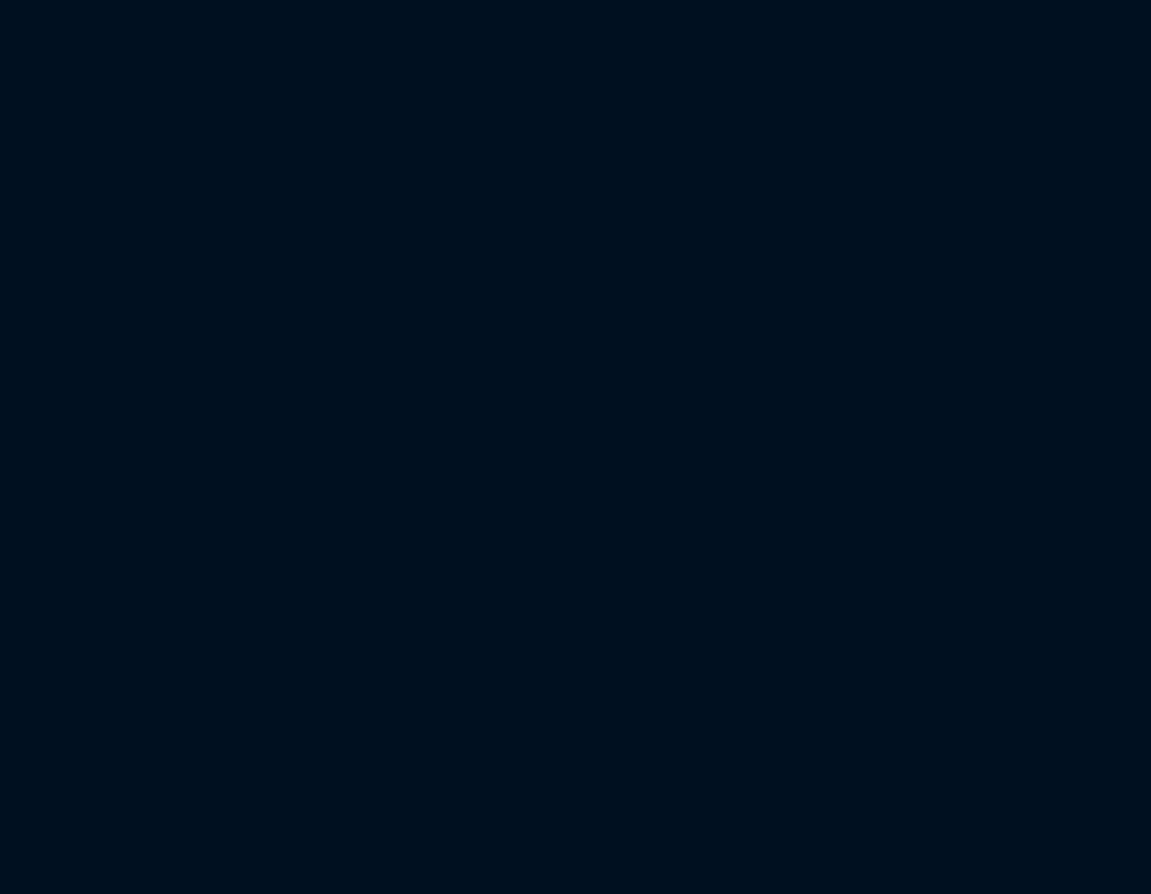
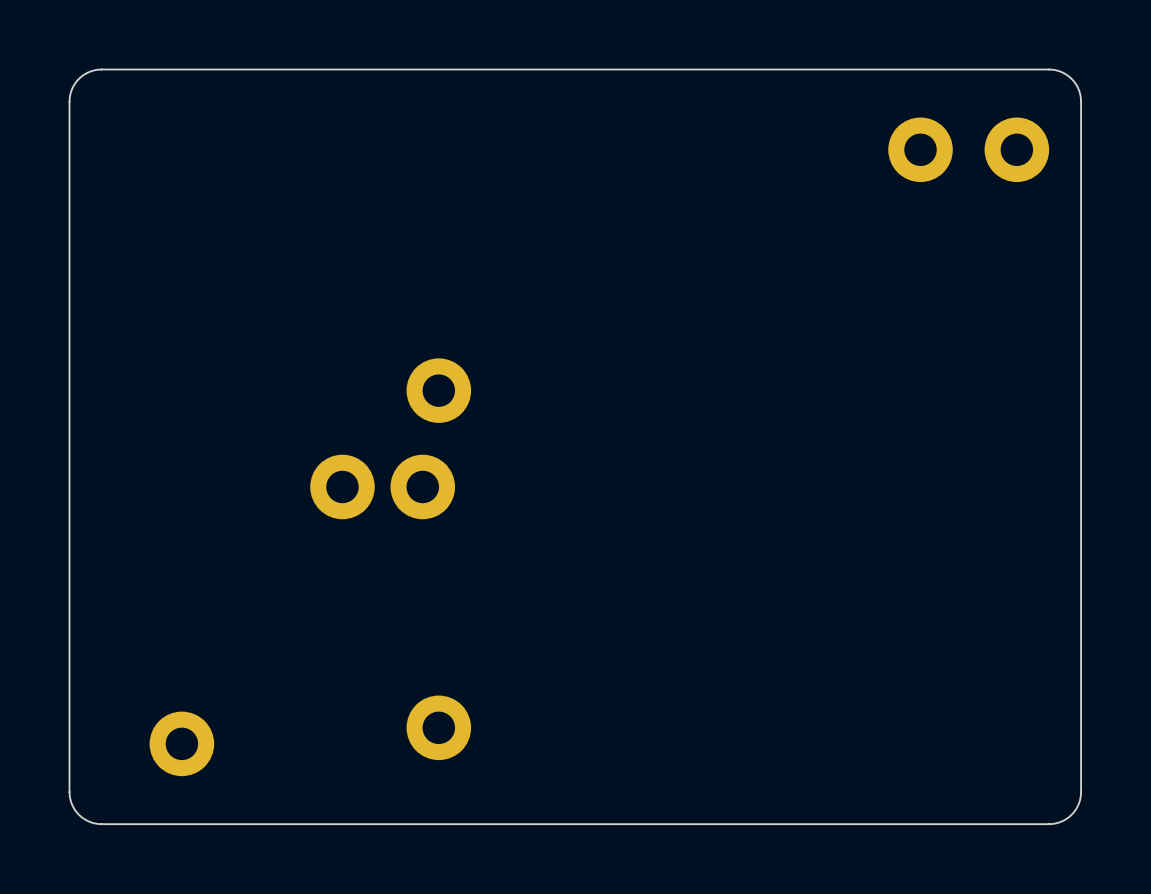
board edge: none -> (1048, 69) (101, 69) (91, 71) (81, 76) (72, 87) (69, 101) (69, 792) (71, 802) (76, 812) (87, 820) (101, 824) (1048, 824) (1059, 822) (1069, 817) (1077, 805) (1081, 792) (1081, 101) (1077, 87) (1071, 78) (1062, 72) (1048, 69)
part: none -> (920, 149)
part: none -> (1016, 149)
part: none -> (438, 390)
part: none -> (342, 486)
part: none -> (422, 486)
part: none -> (438, 727)
part: none -> (181, 743)

